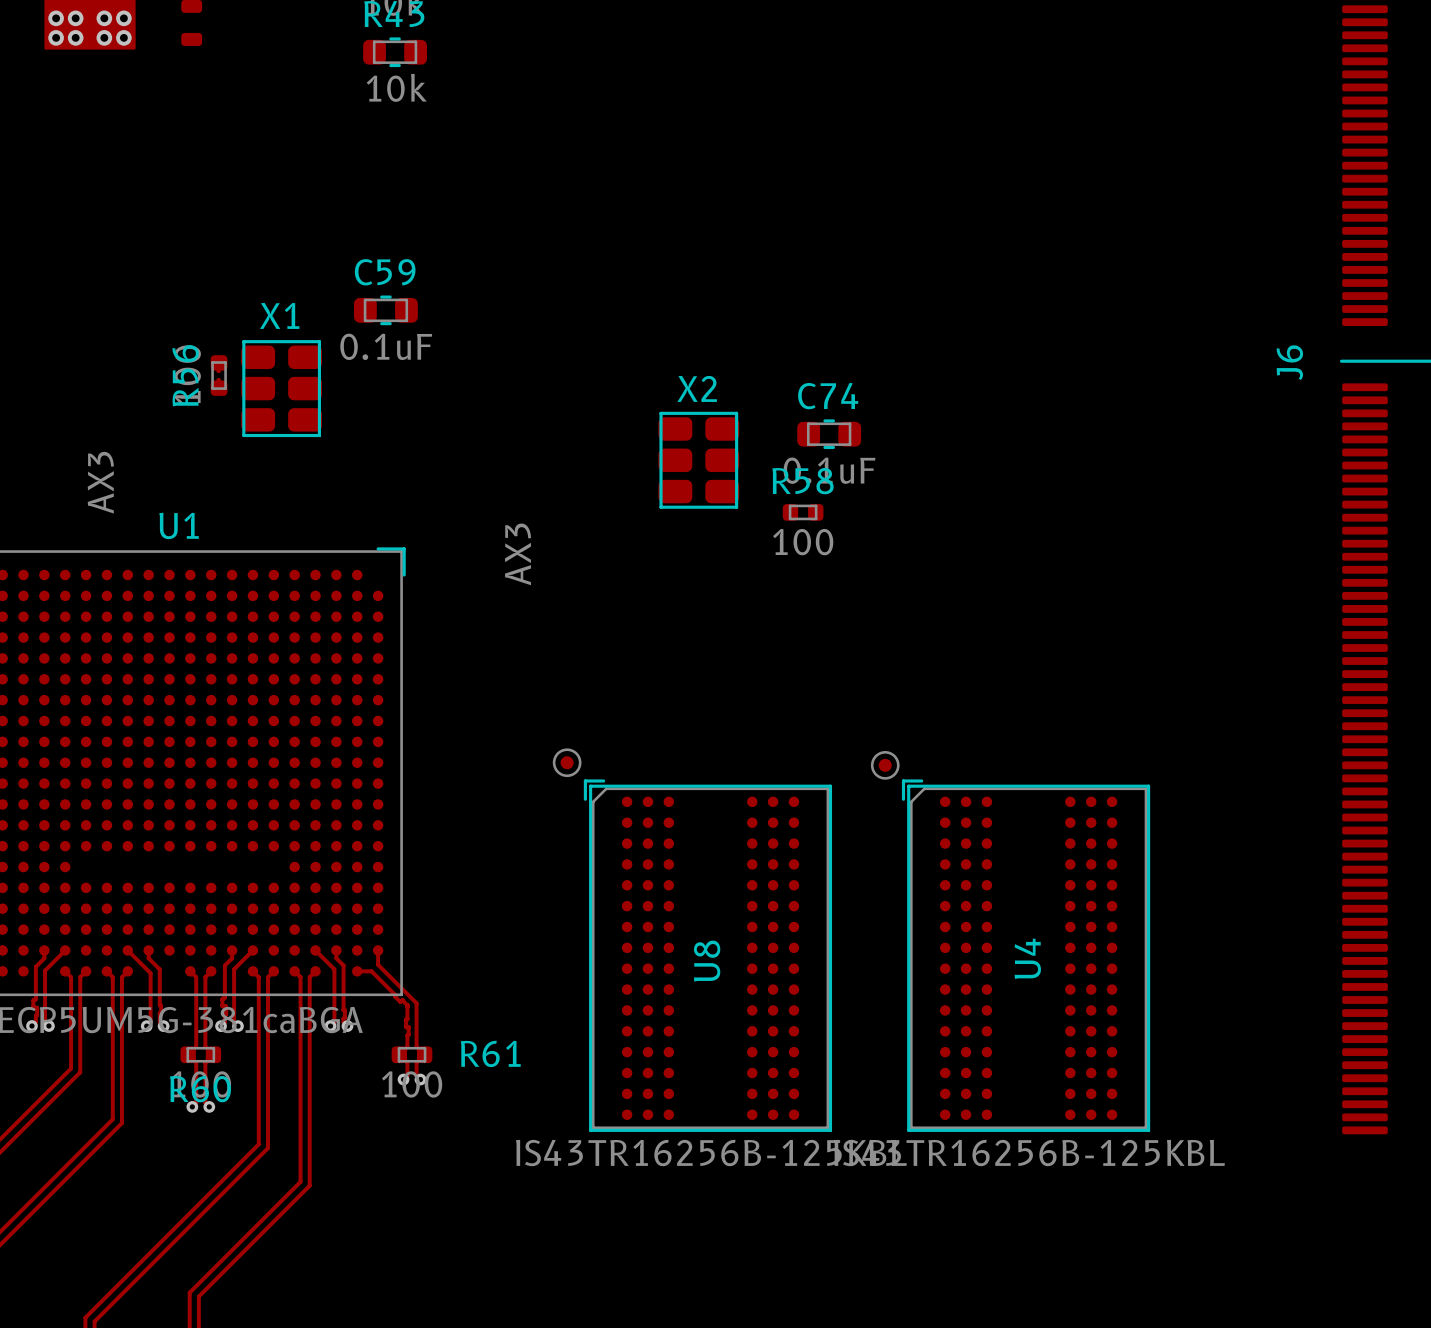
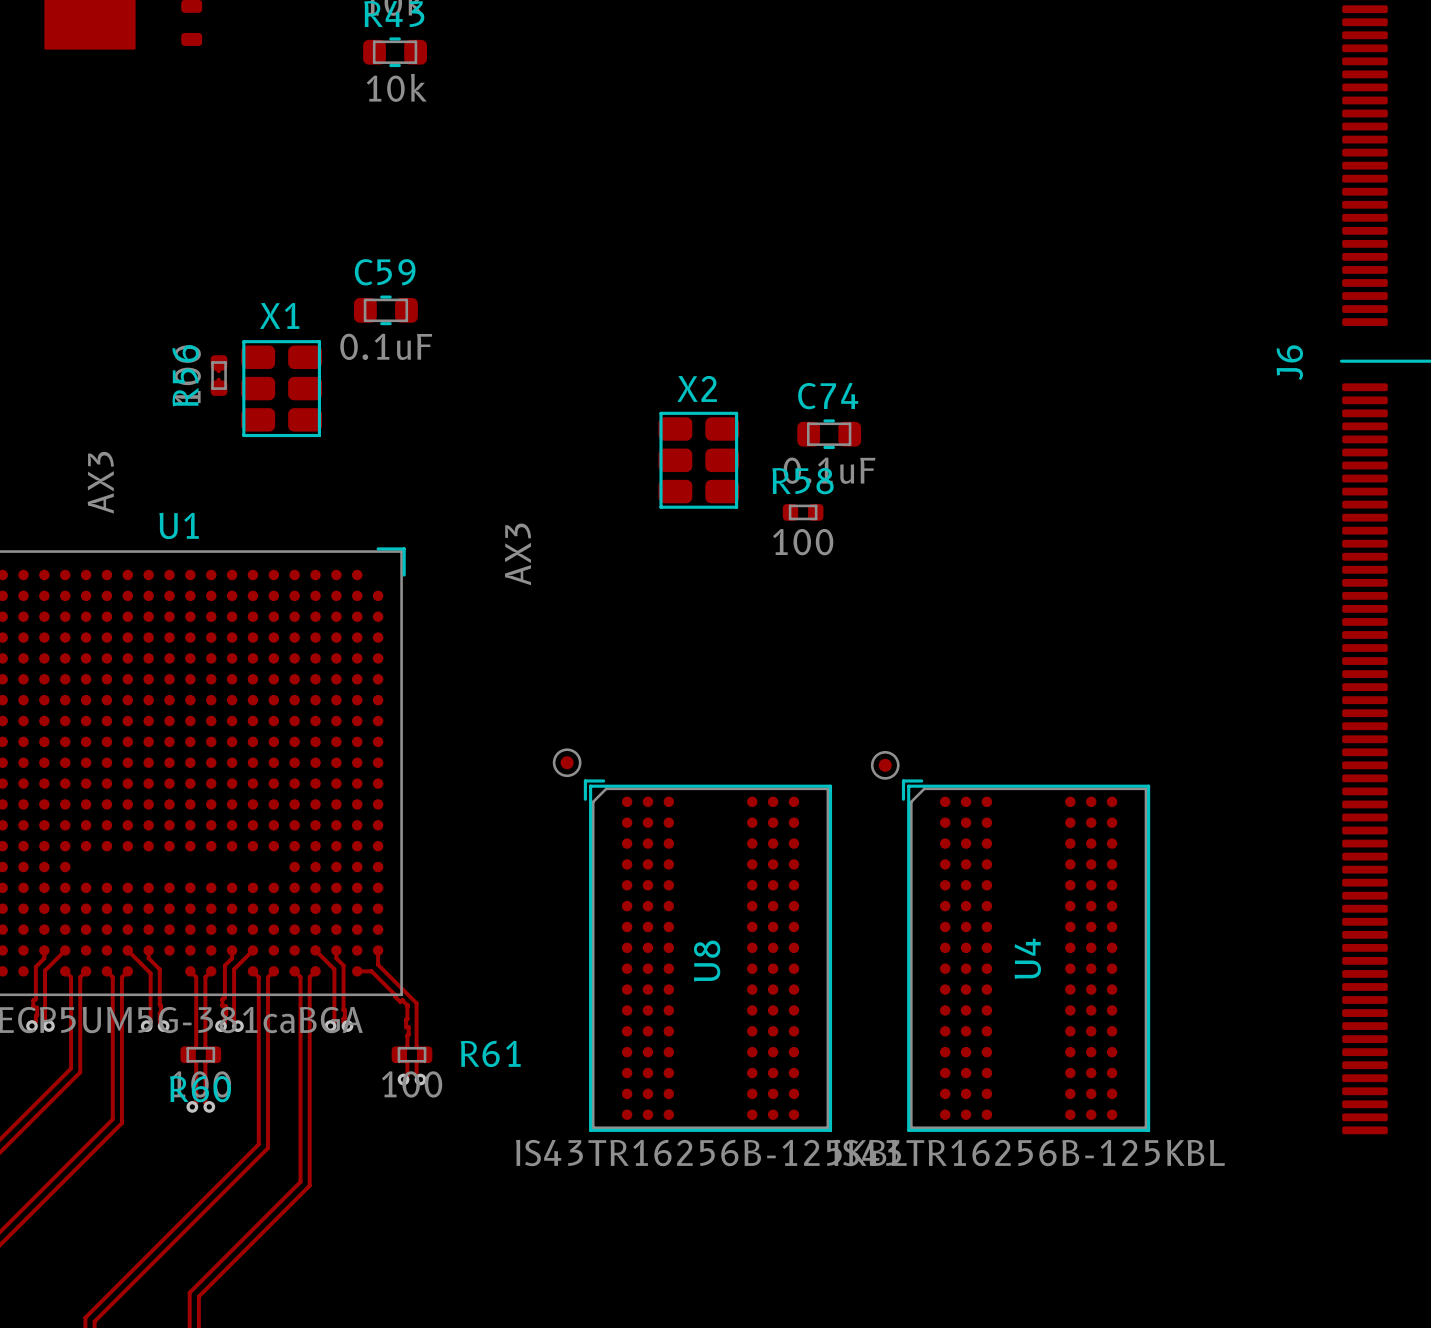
via: (56, 18) -> none
via: (75, 18) -> none
via: (104, 18) -> none
via: (123, 18) -> none
via: (56, 37) -> none
via: (75, 37) -> none
via: (104, 37) -> none
via: (123, 37) -> none

